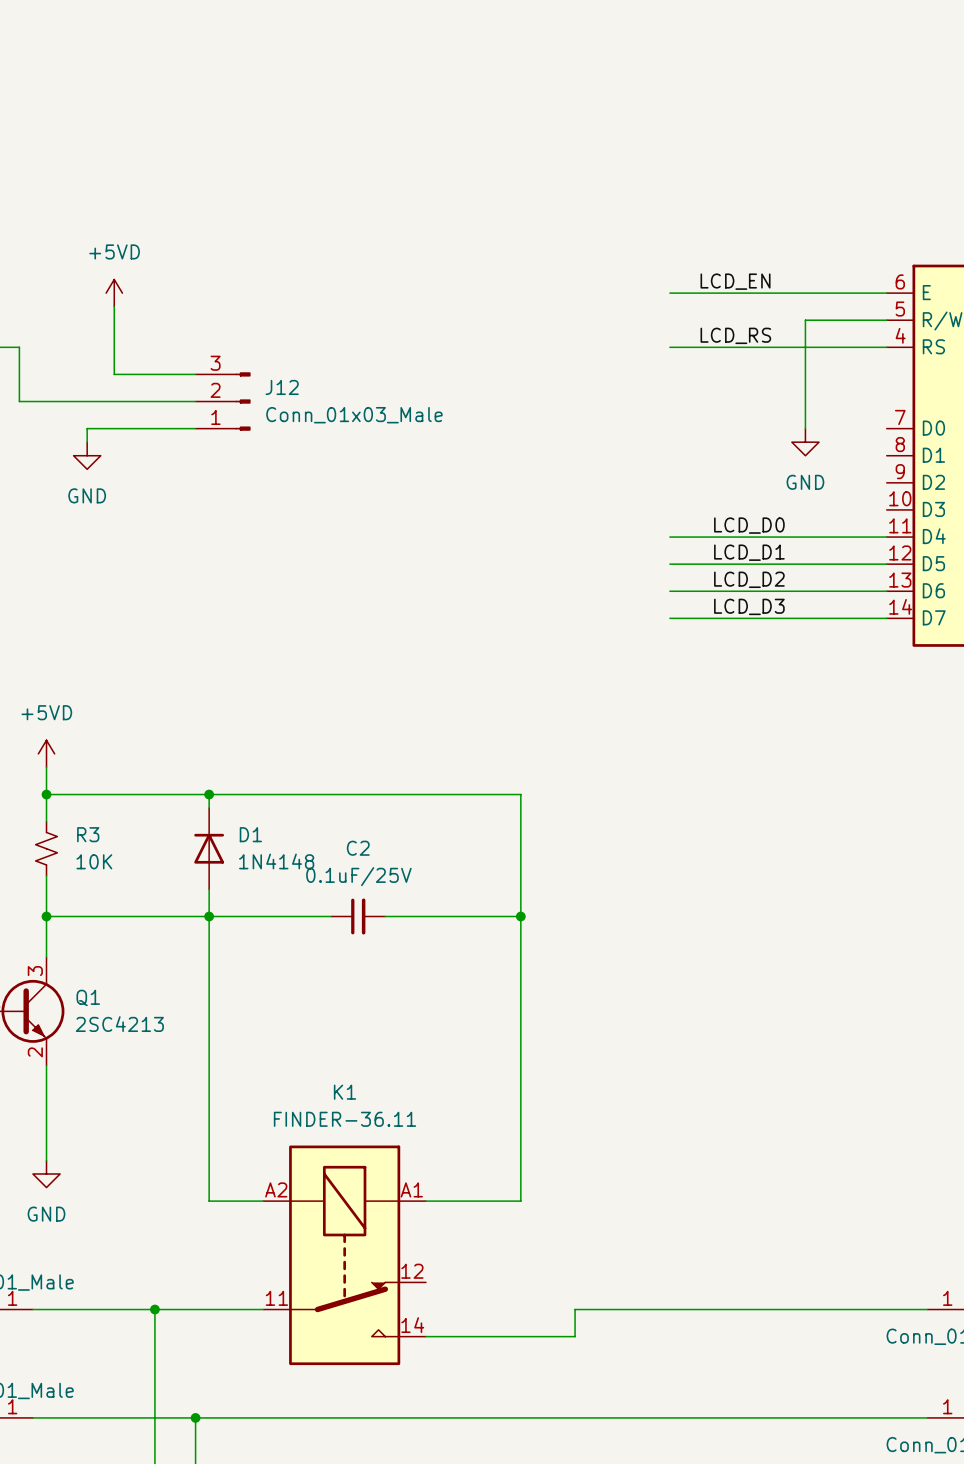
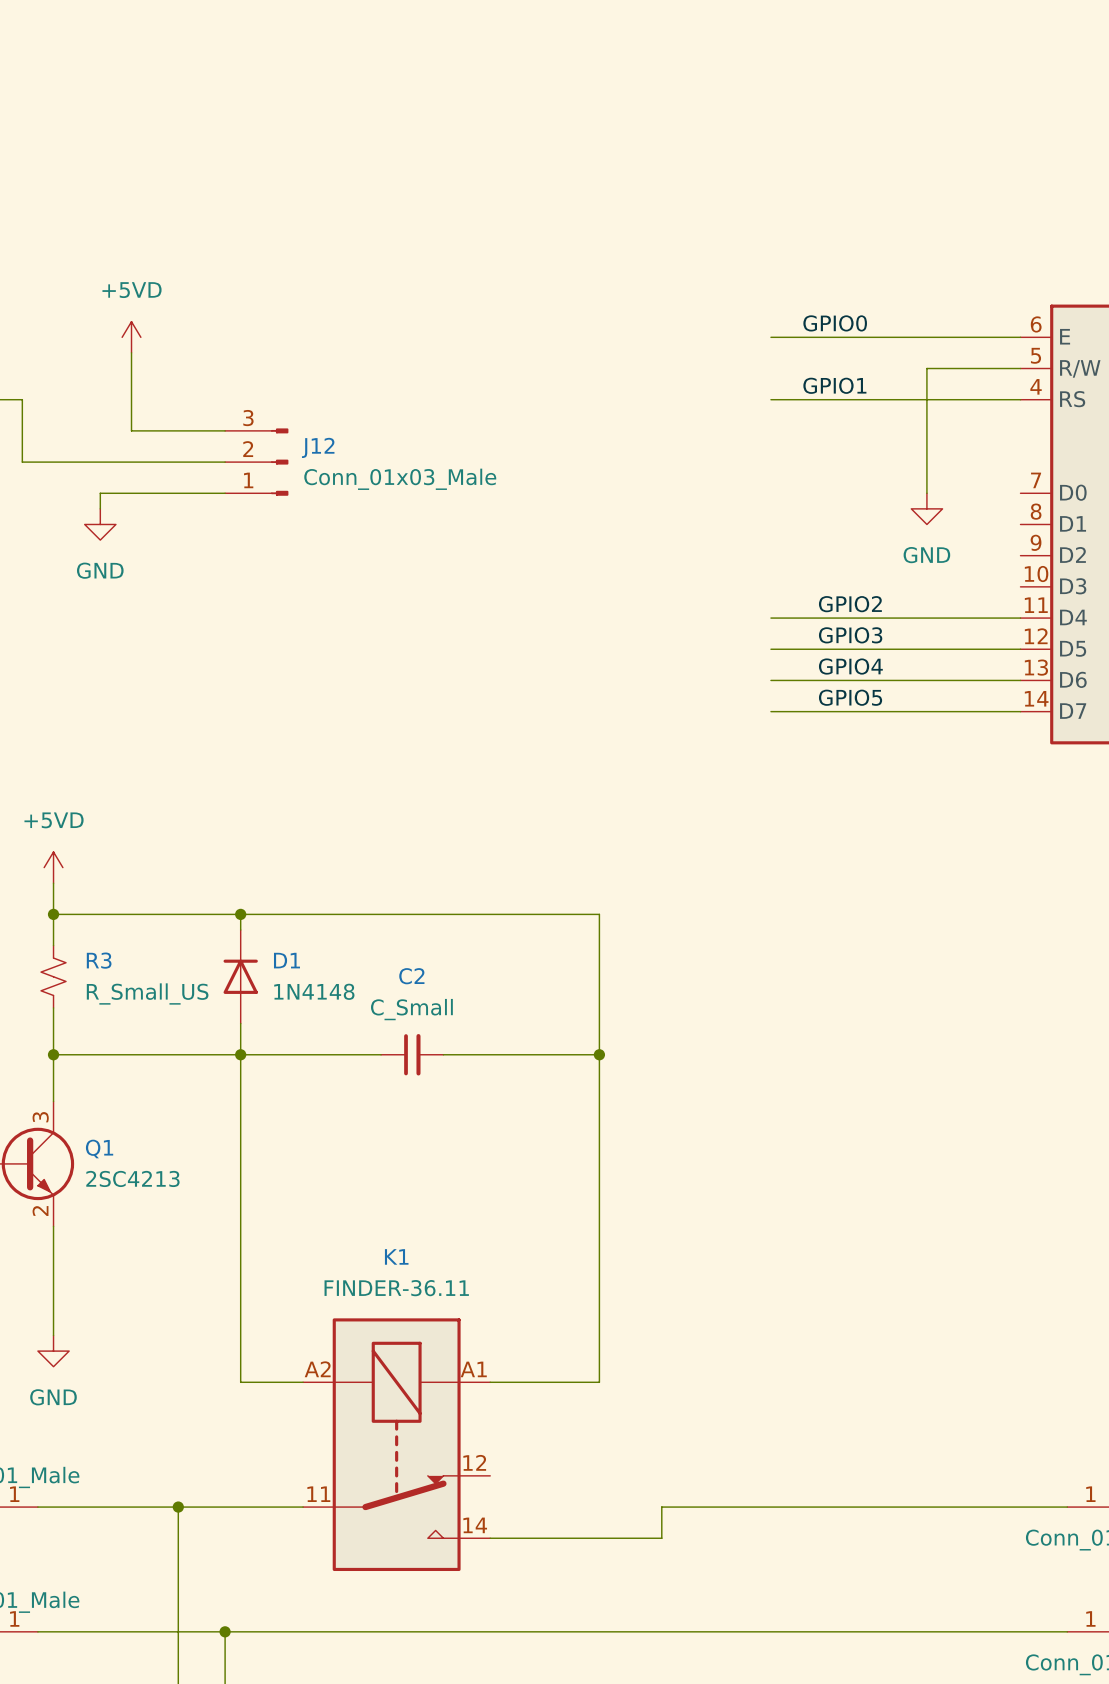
label: LCD_EN (735, 281) -> GPIO0 (835, 323)
label: LCD_RS (735, 335) -> GPIO1 (834, 385)
label: LCD_D0 (749, 525) -> GPIO2 (850, 604)
label: LCD_D1 (749, 552) -> GPIO3 (850, 635)
label: LCD_D2 (749, 579) -> GPIO4 (850, 666)
label: LCD_D3 (749, 606) -> GPIO5 (850, 697)
R3 value: 10K (94, 861) -> R_Small_US (147, 993)
C2 value: 0.1uF/25V (358, 876) -> C_Small (411, 1009)

